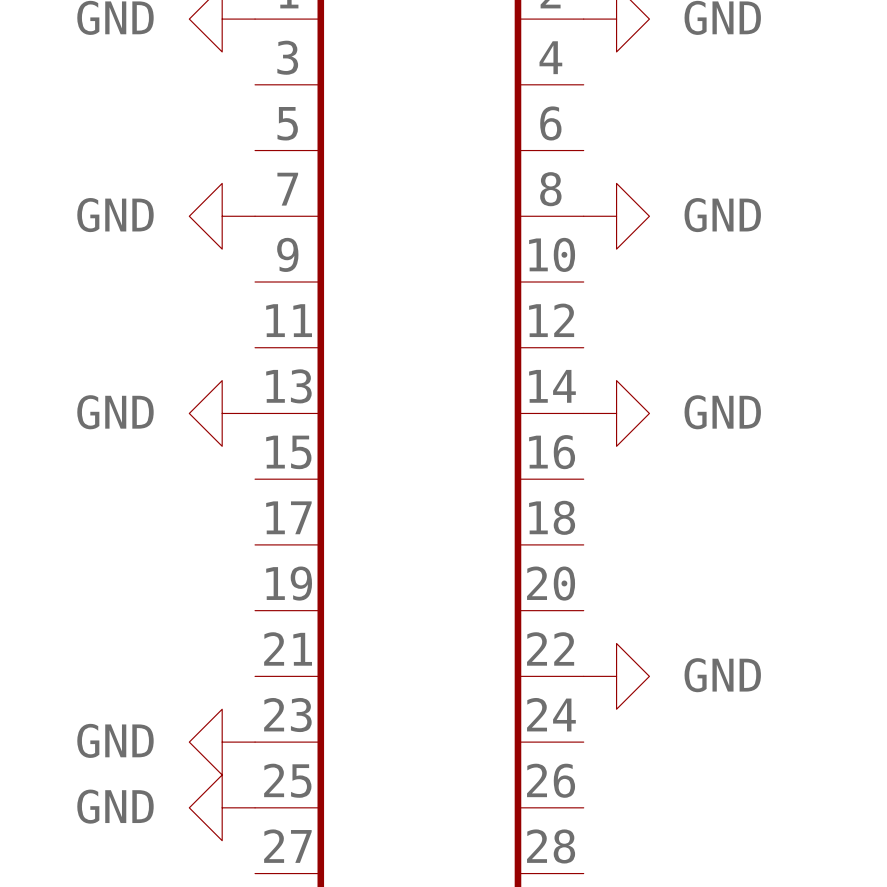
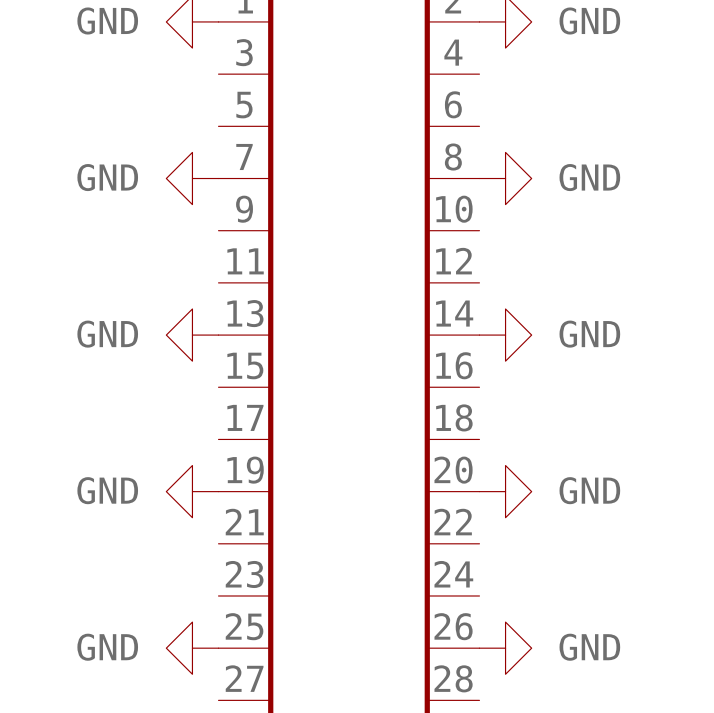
power symbol: none -> GND (505, 491)
power symbol: GND (616, 676) -> none
power symbol position: GND (222, 742) -> GND (192, 491)
power symbol: none -> GND (505, 648)

